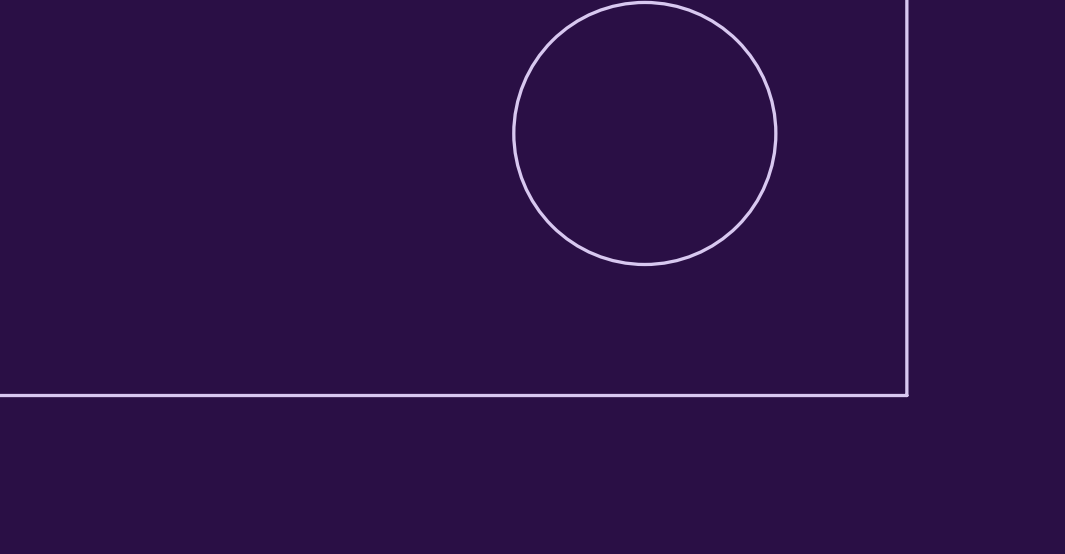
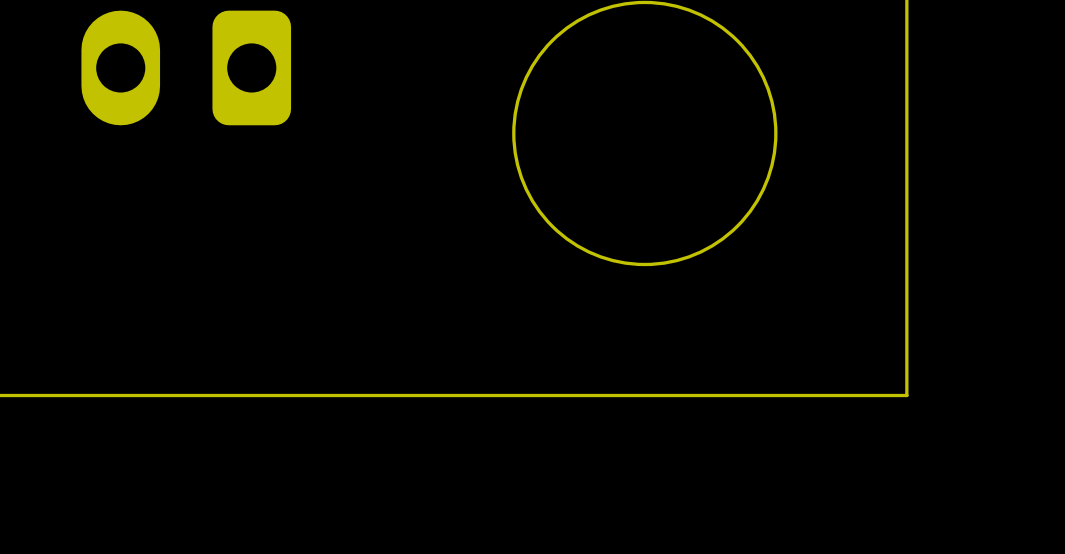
part: none -> (186, 67)

